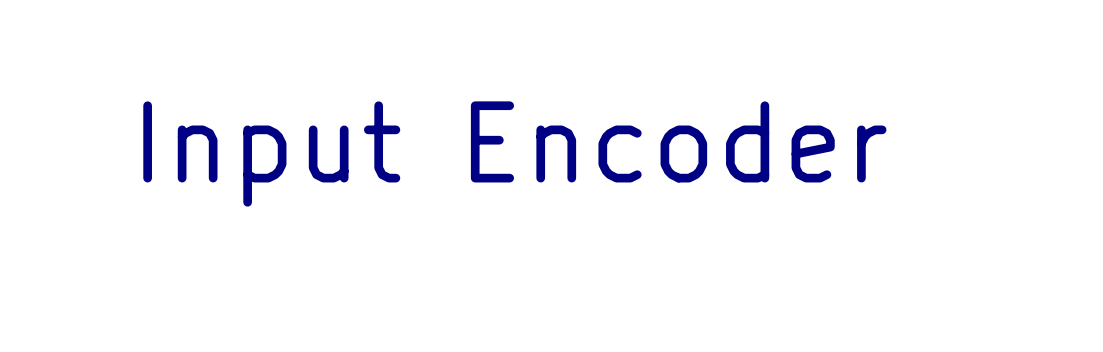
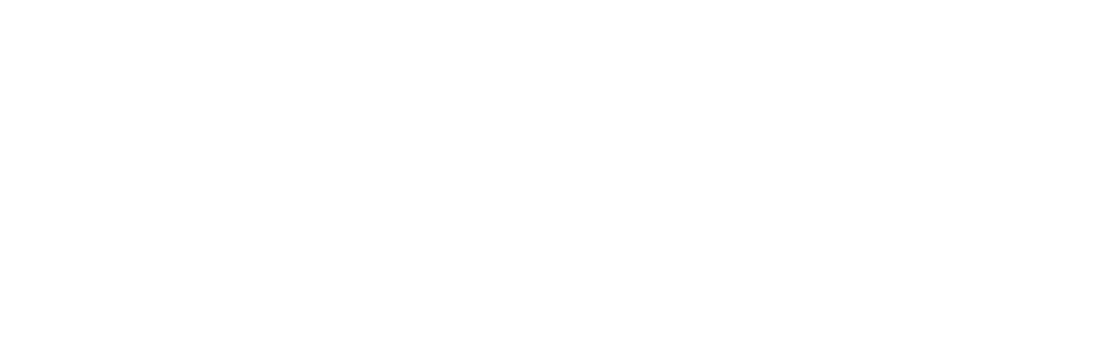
text: Input Encoder (514, 153) -> none

